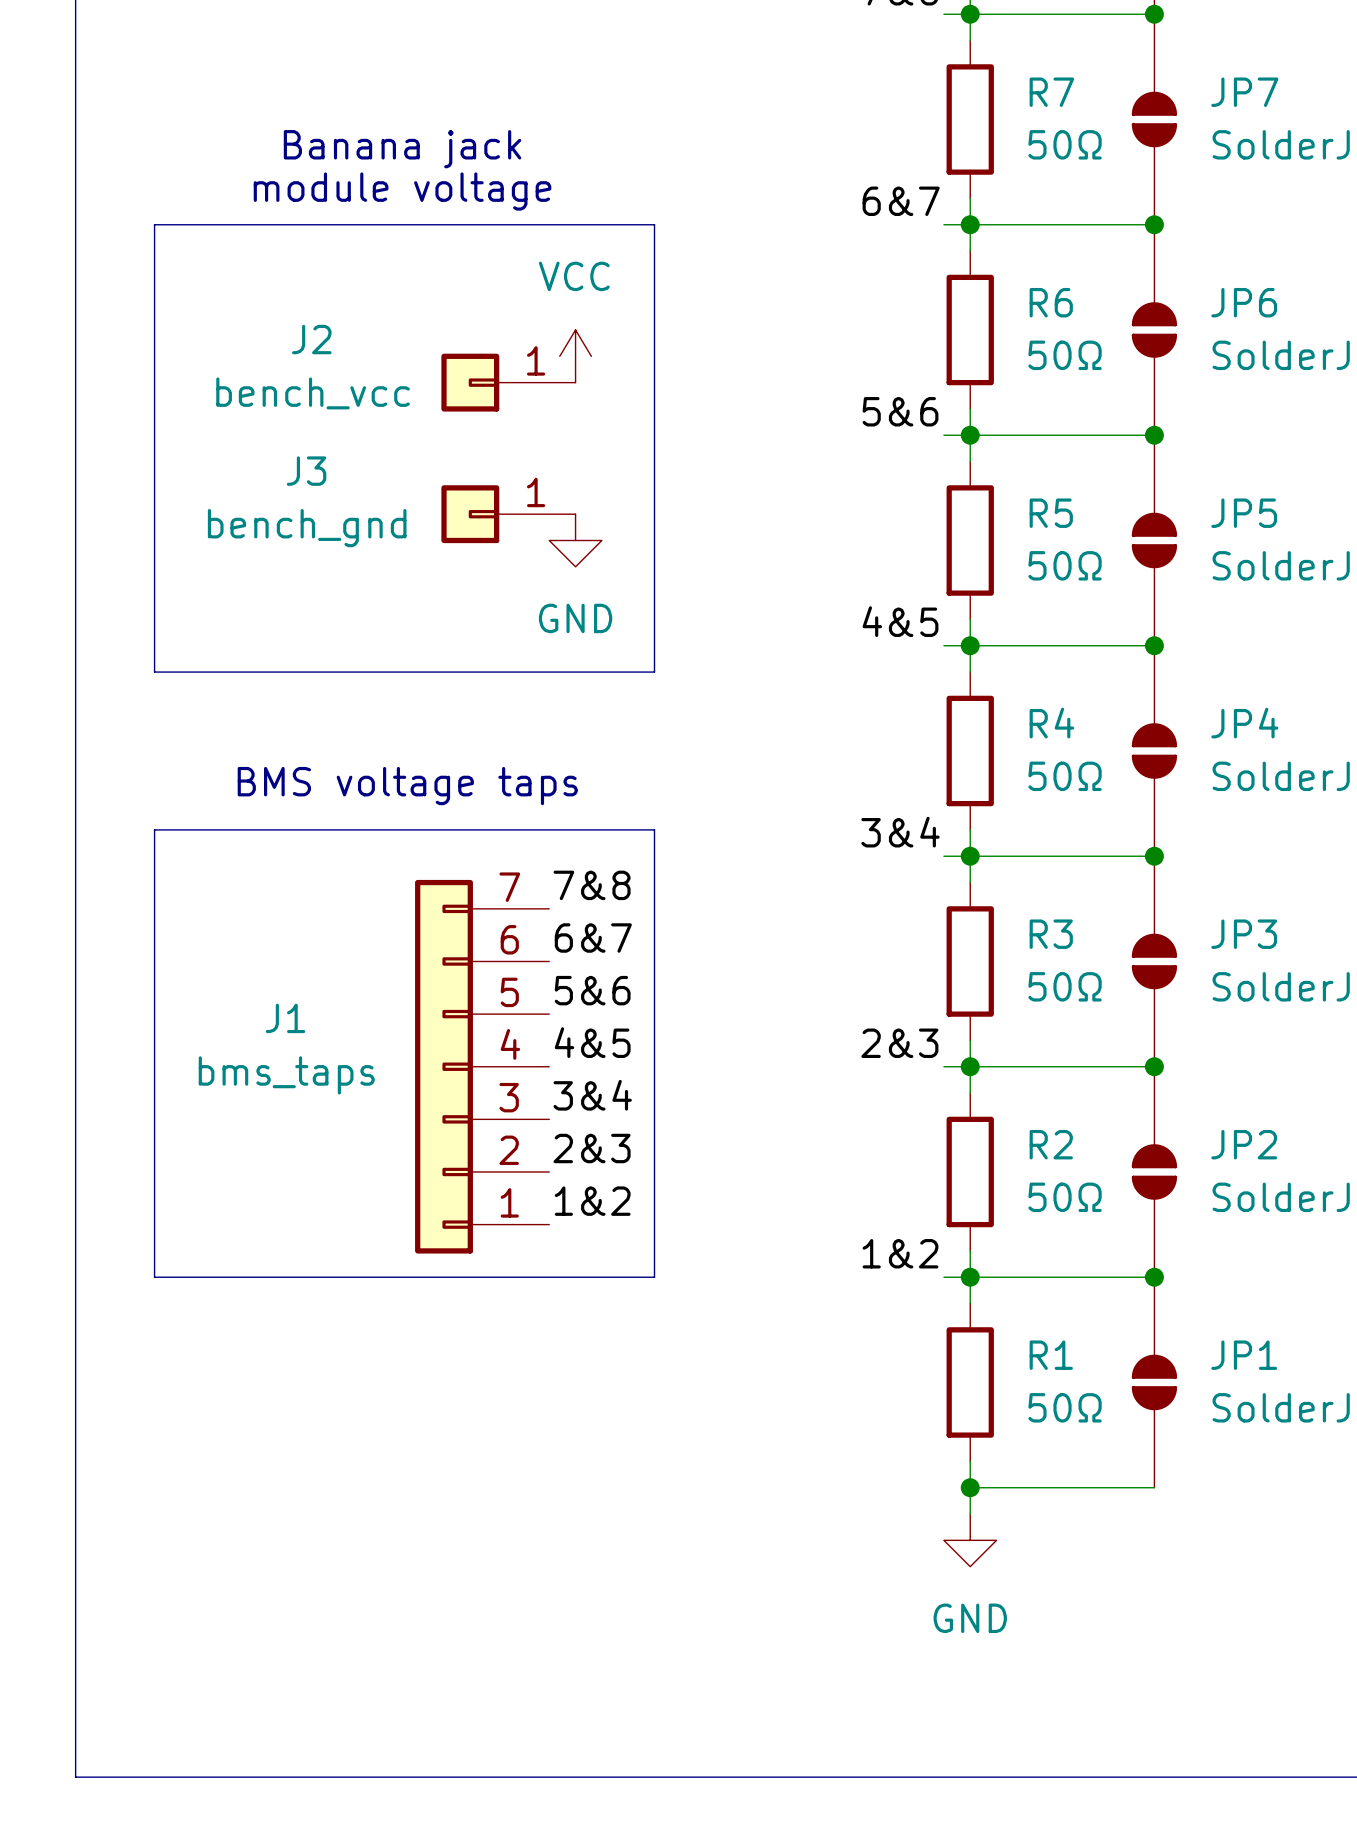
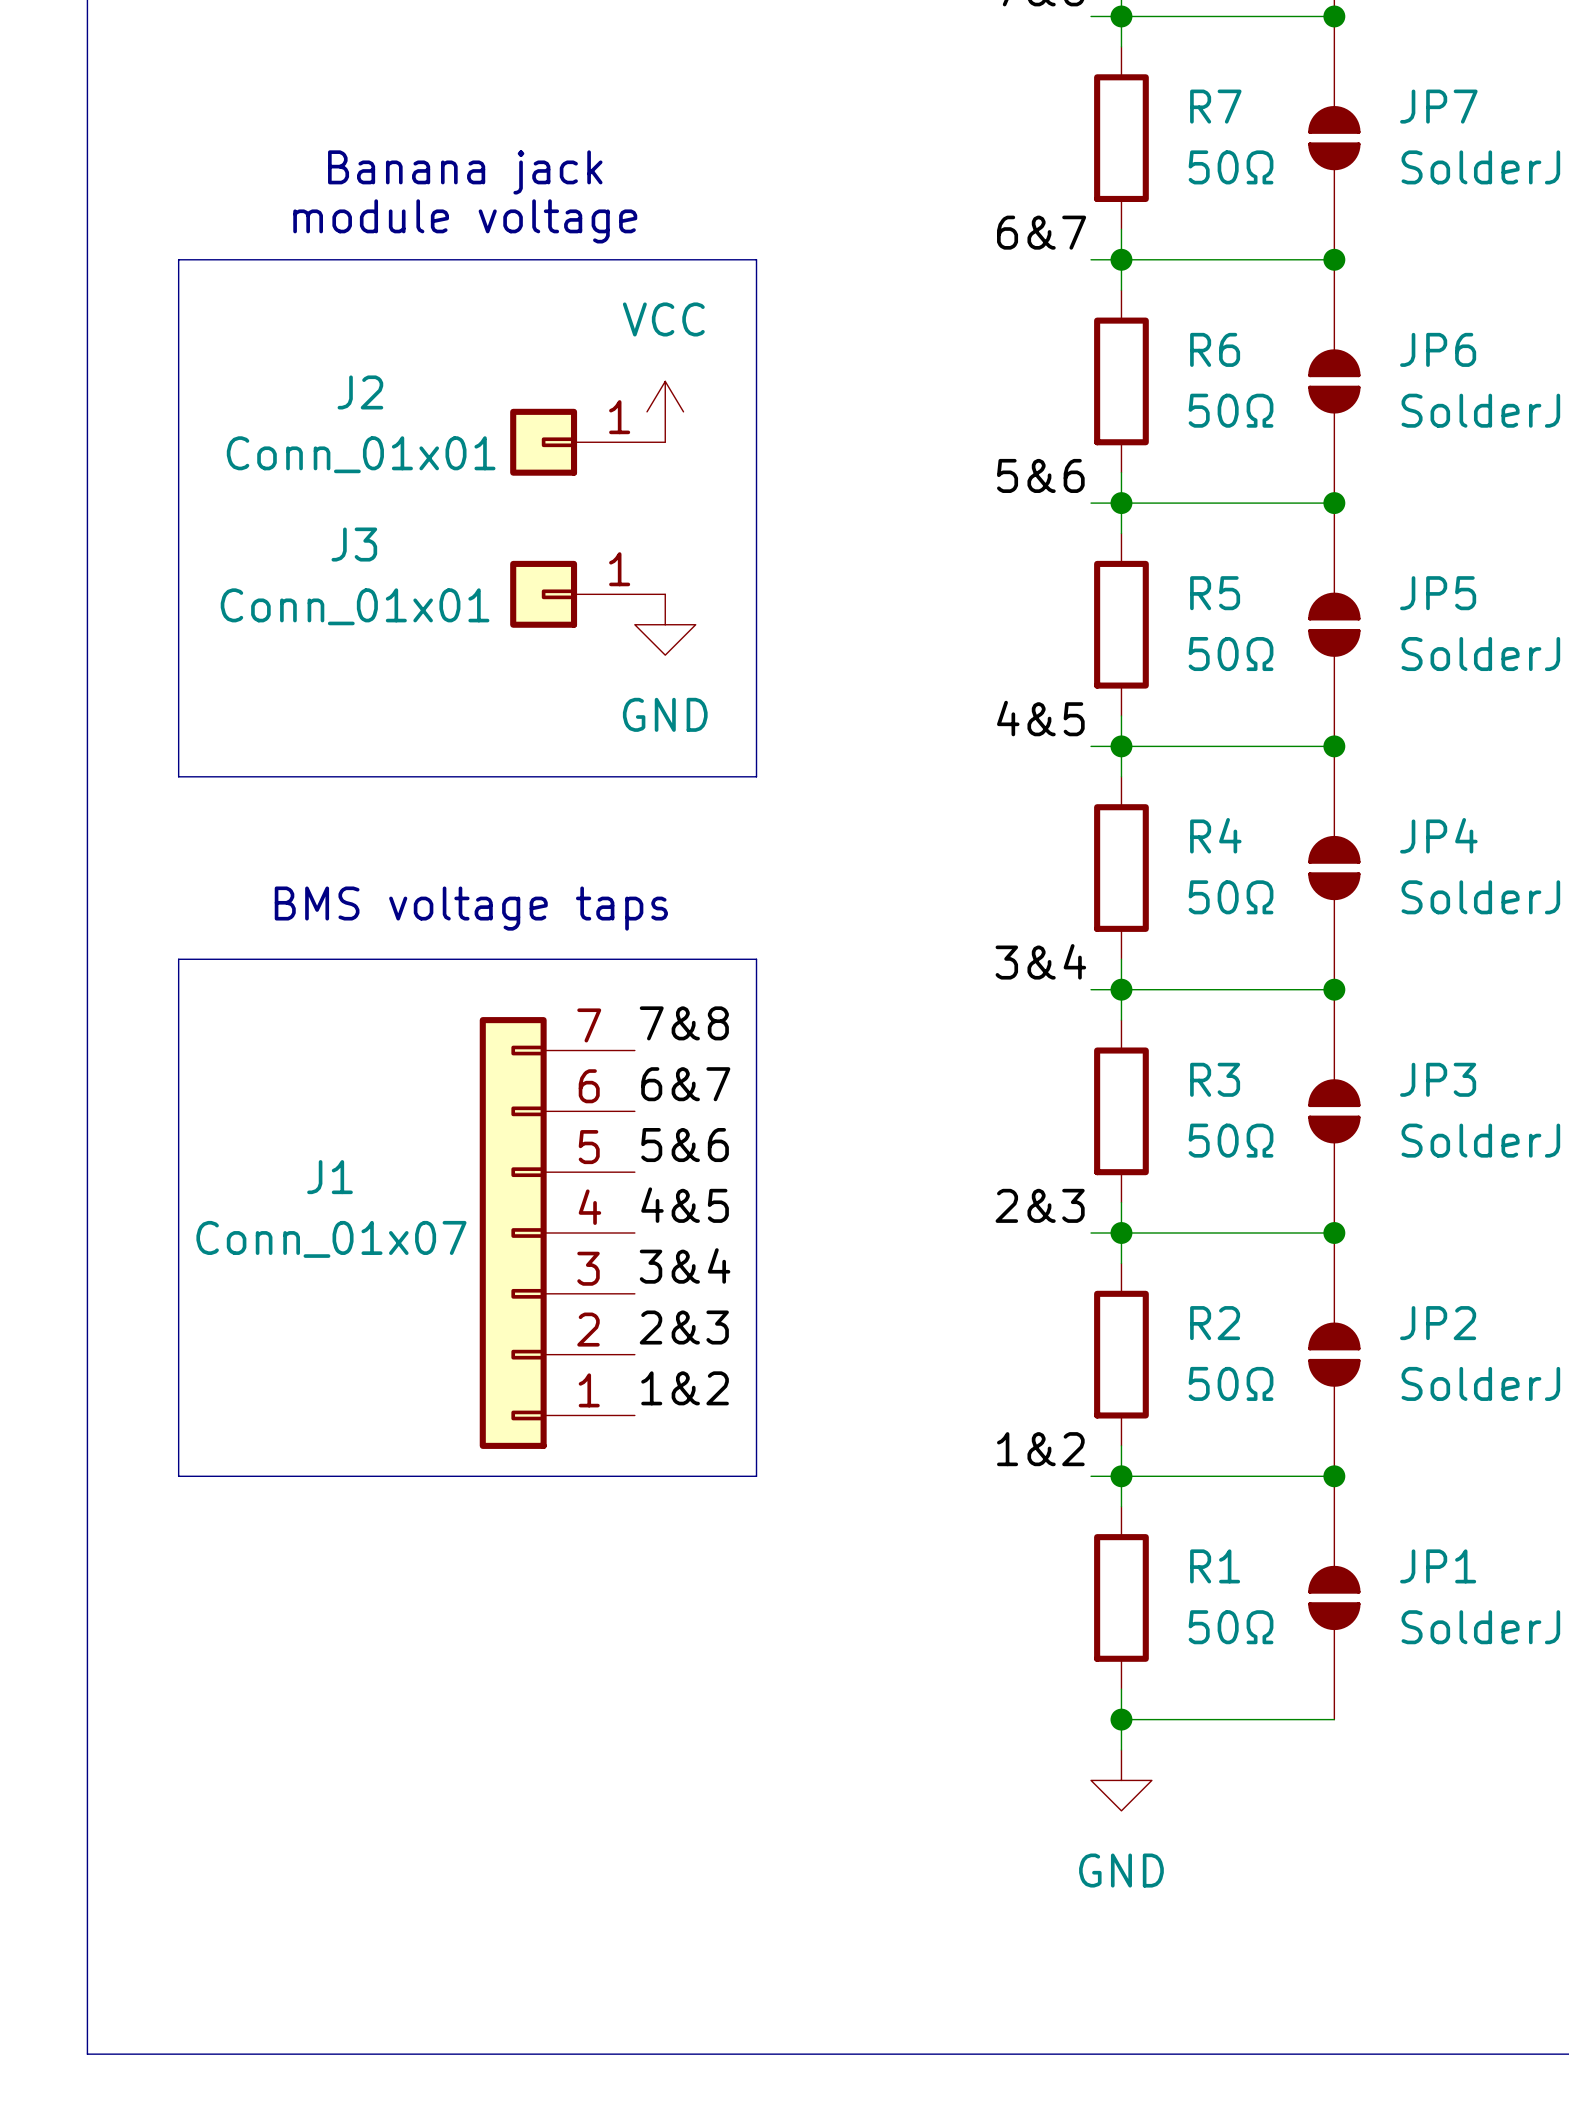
J2 value: bench_vcc (313, 393) -> Conn_01x01 (361, 454)
J3 value: bench_gnd (307, 528) -> Conn_01x01 (355, 606)
J1 value: bms_taps (286, 1075) -> Conn_01x07 (331, 1239)

